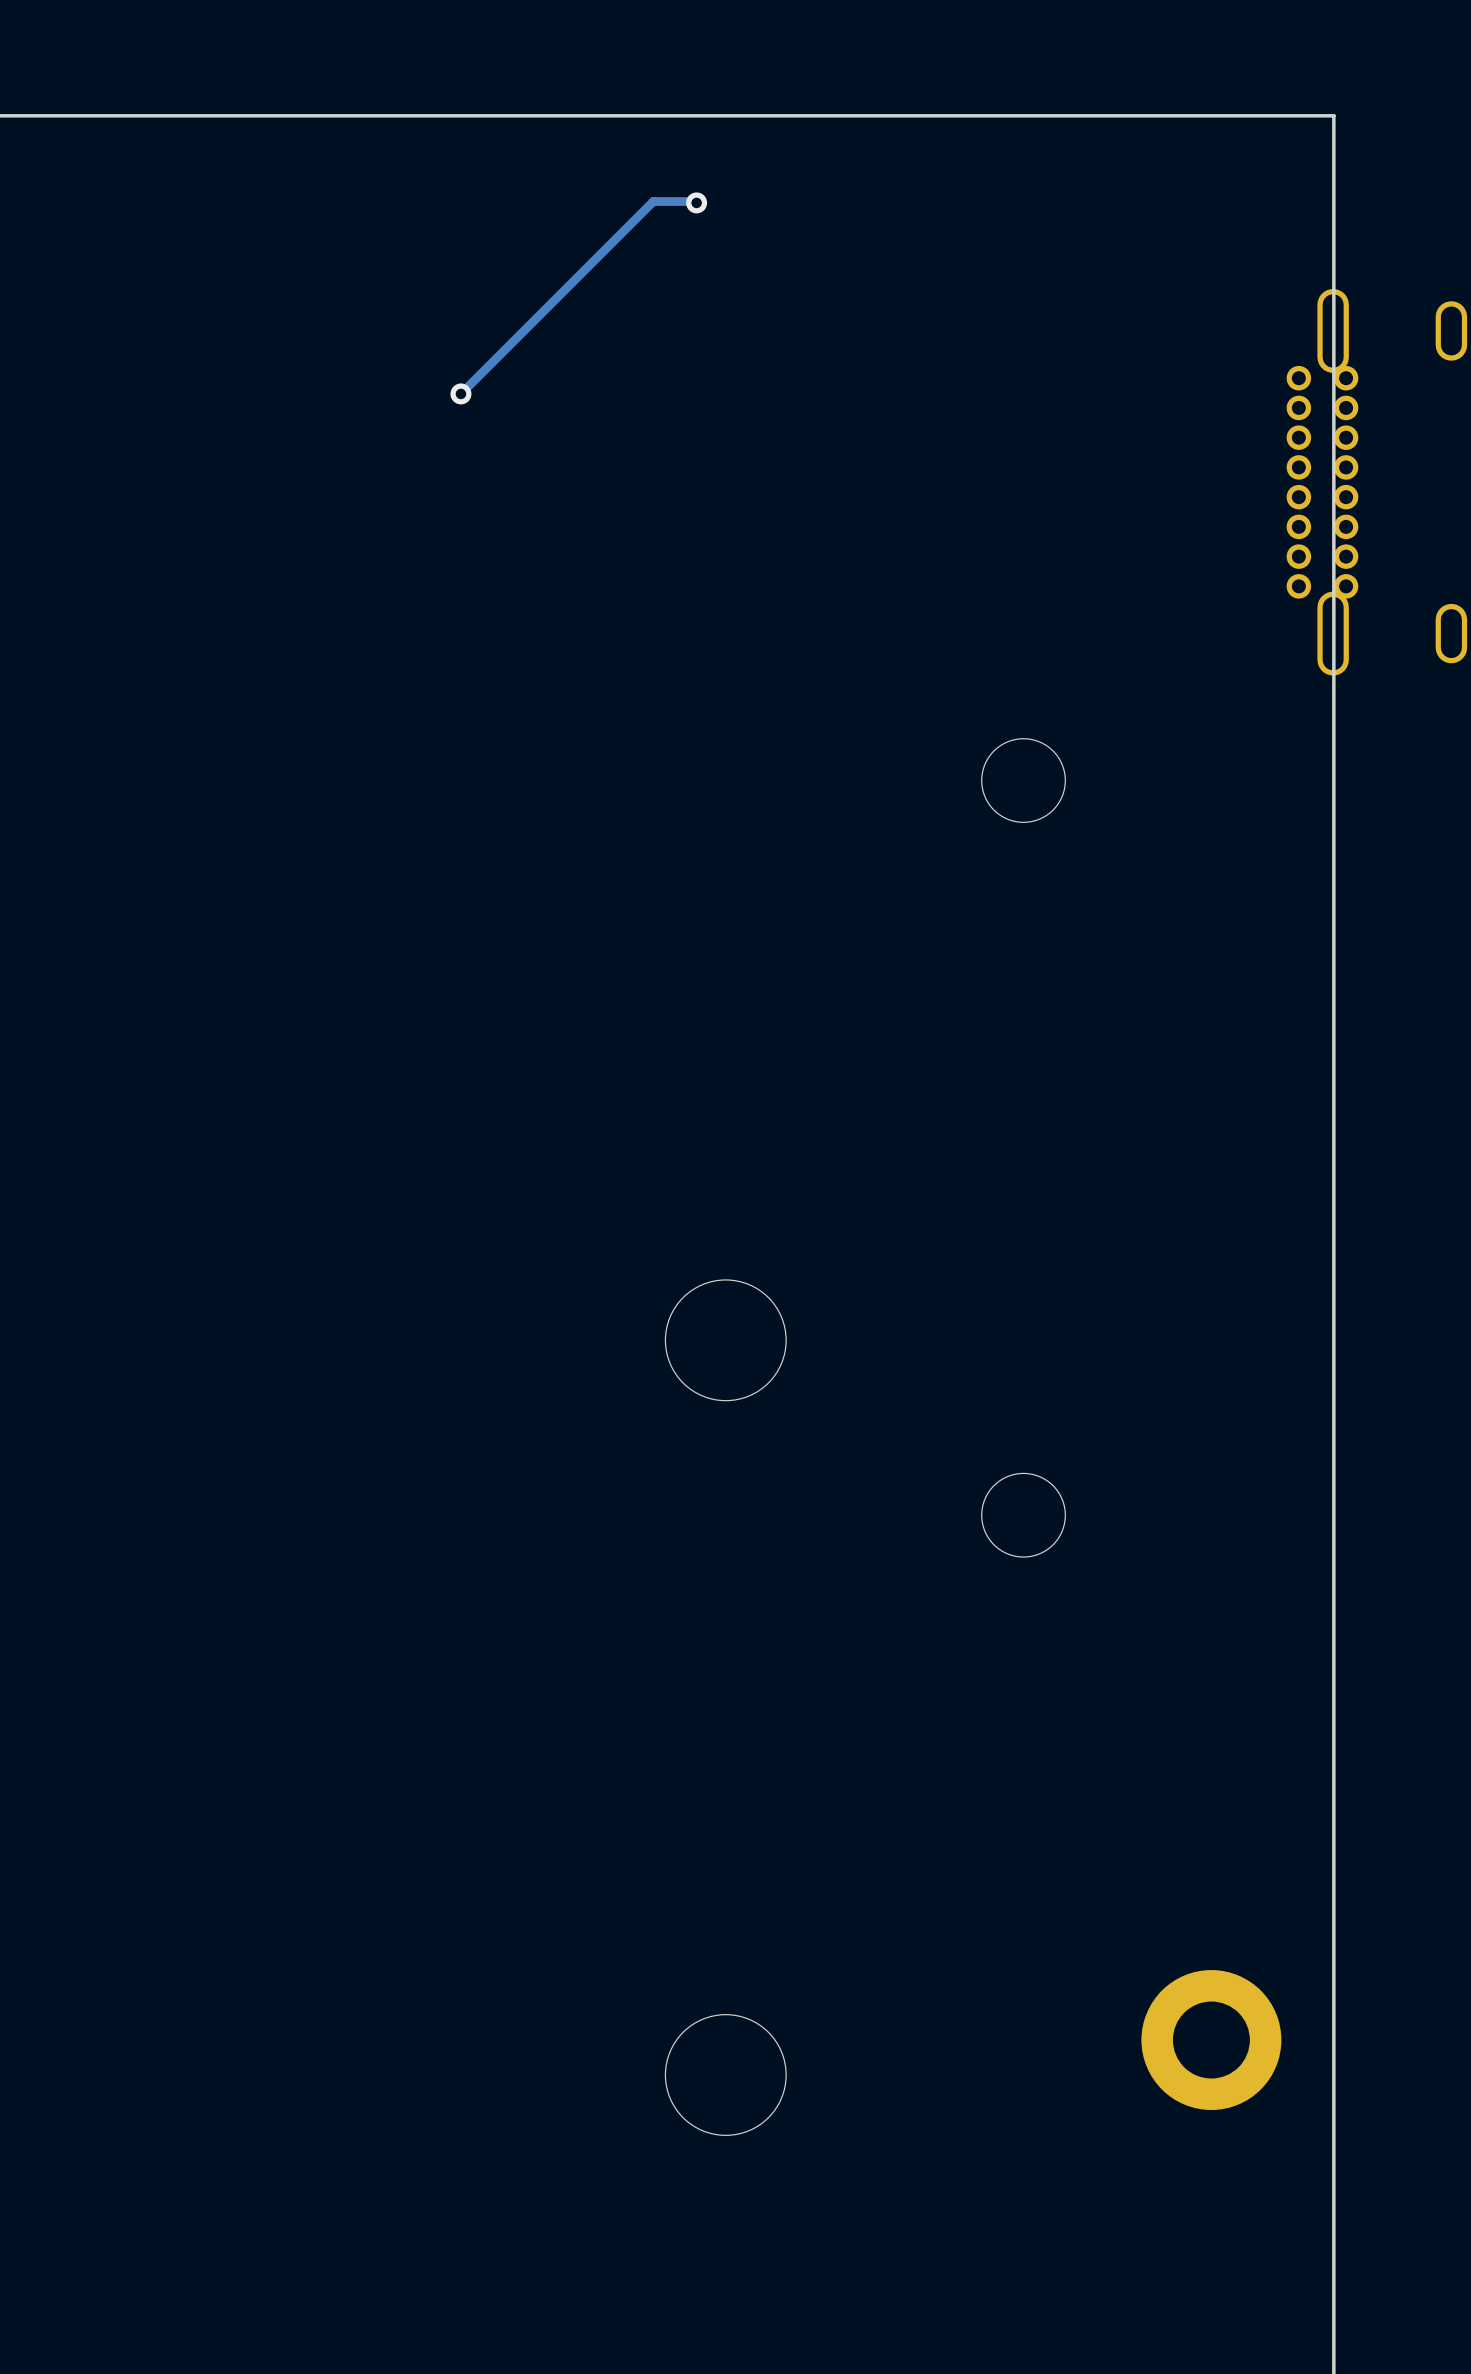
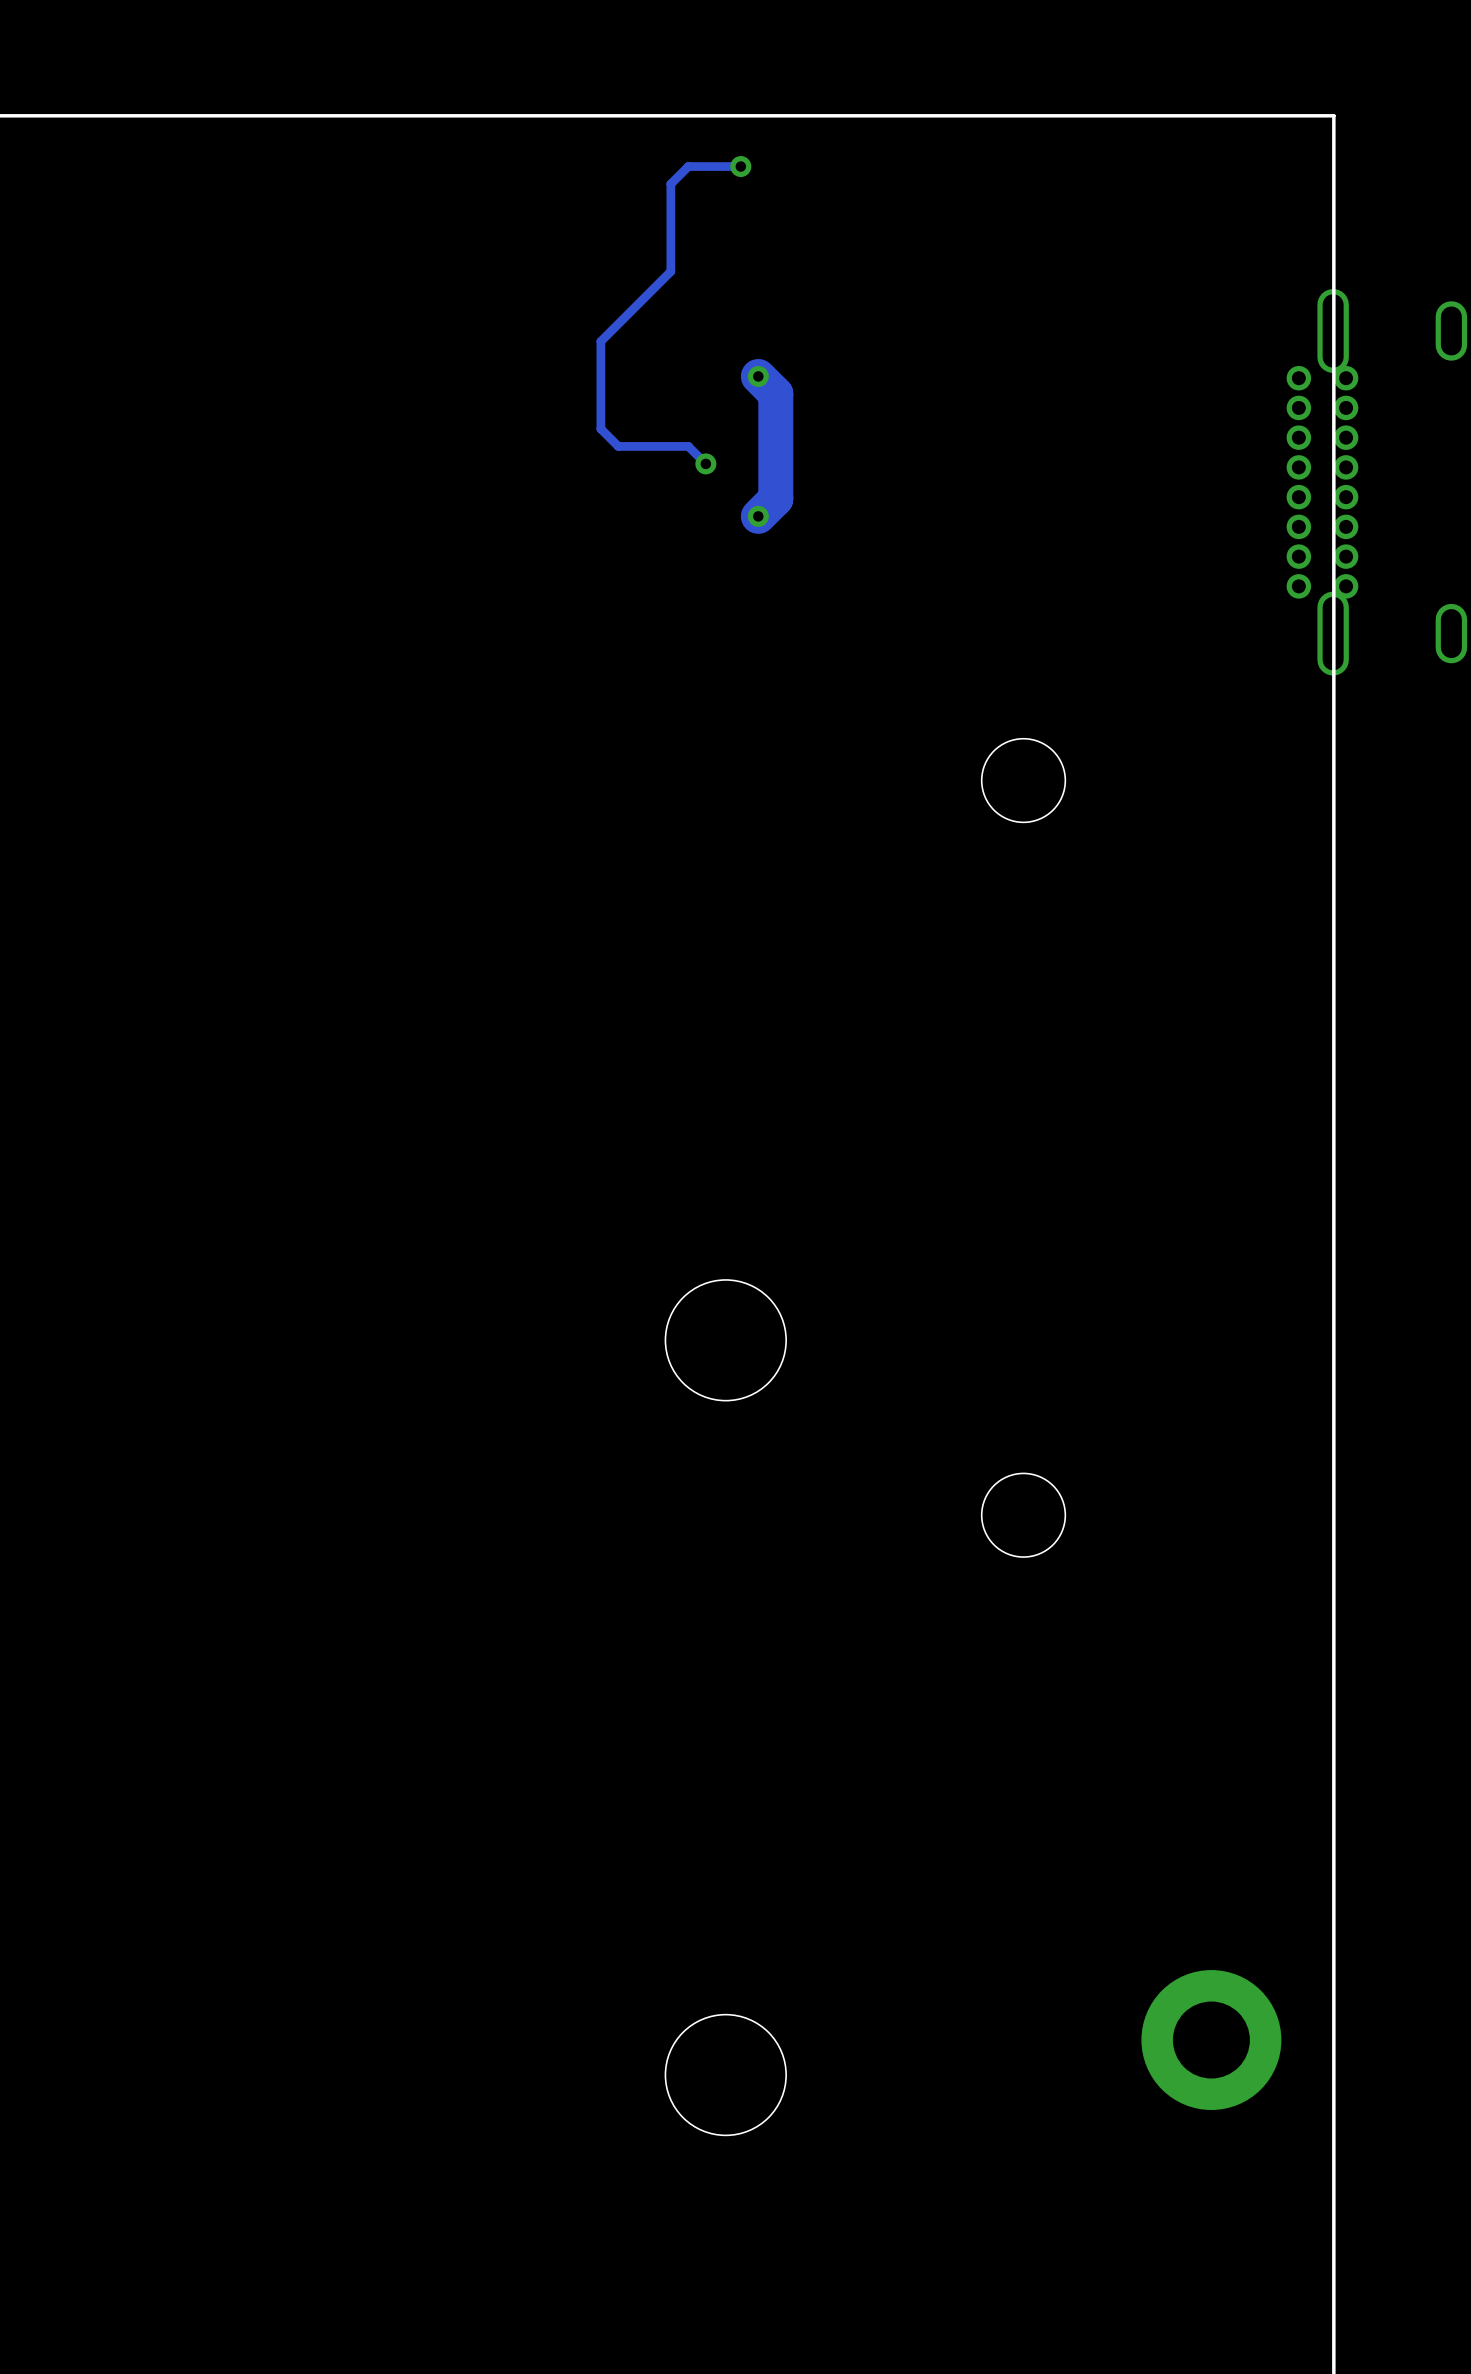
track: none -> (740, 166) (688, 166) (670, 184) (670, 271) (600, 341) (600, 428) (618, 446) (688, 446) (705, 463)
track: (688, 201) (653, 201) (460, 393) -> none
via position: (696, 202) -> (740, 166)
track: none -> (758, 376) (775, 393) (775, 498) (758, 516)
via: none -> (758, 376)
via: (460, 393) -> none
via: none -> (705, 463)
via: none -> (758, 516)

